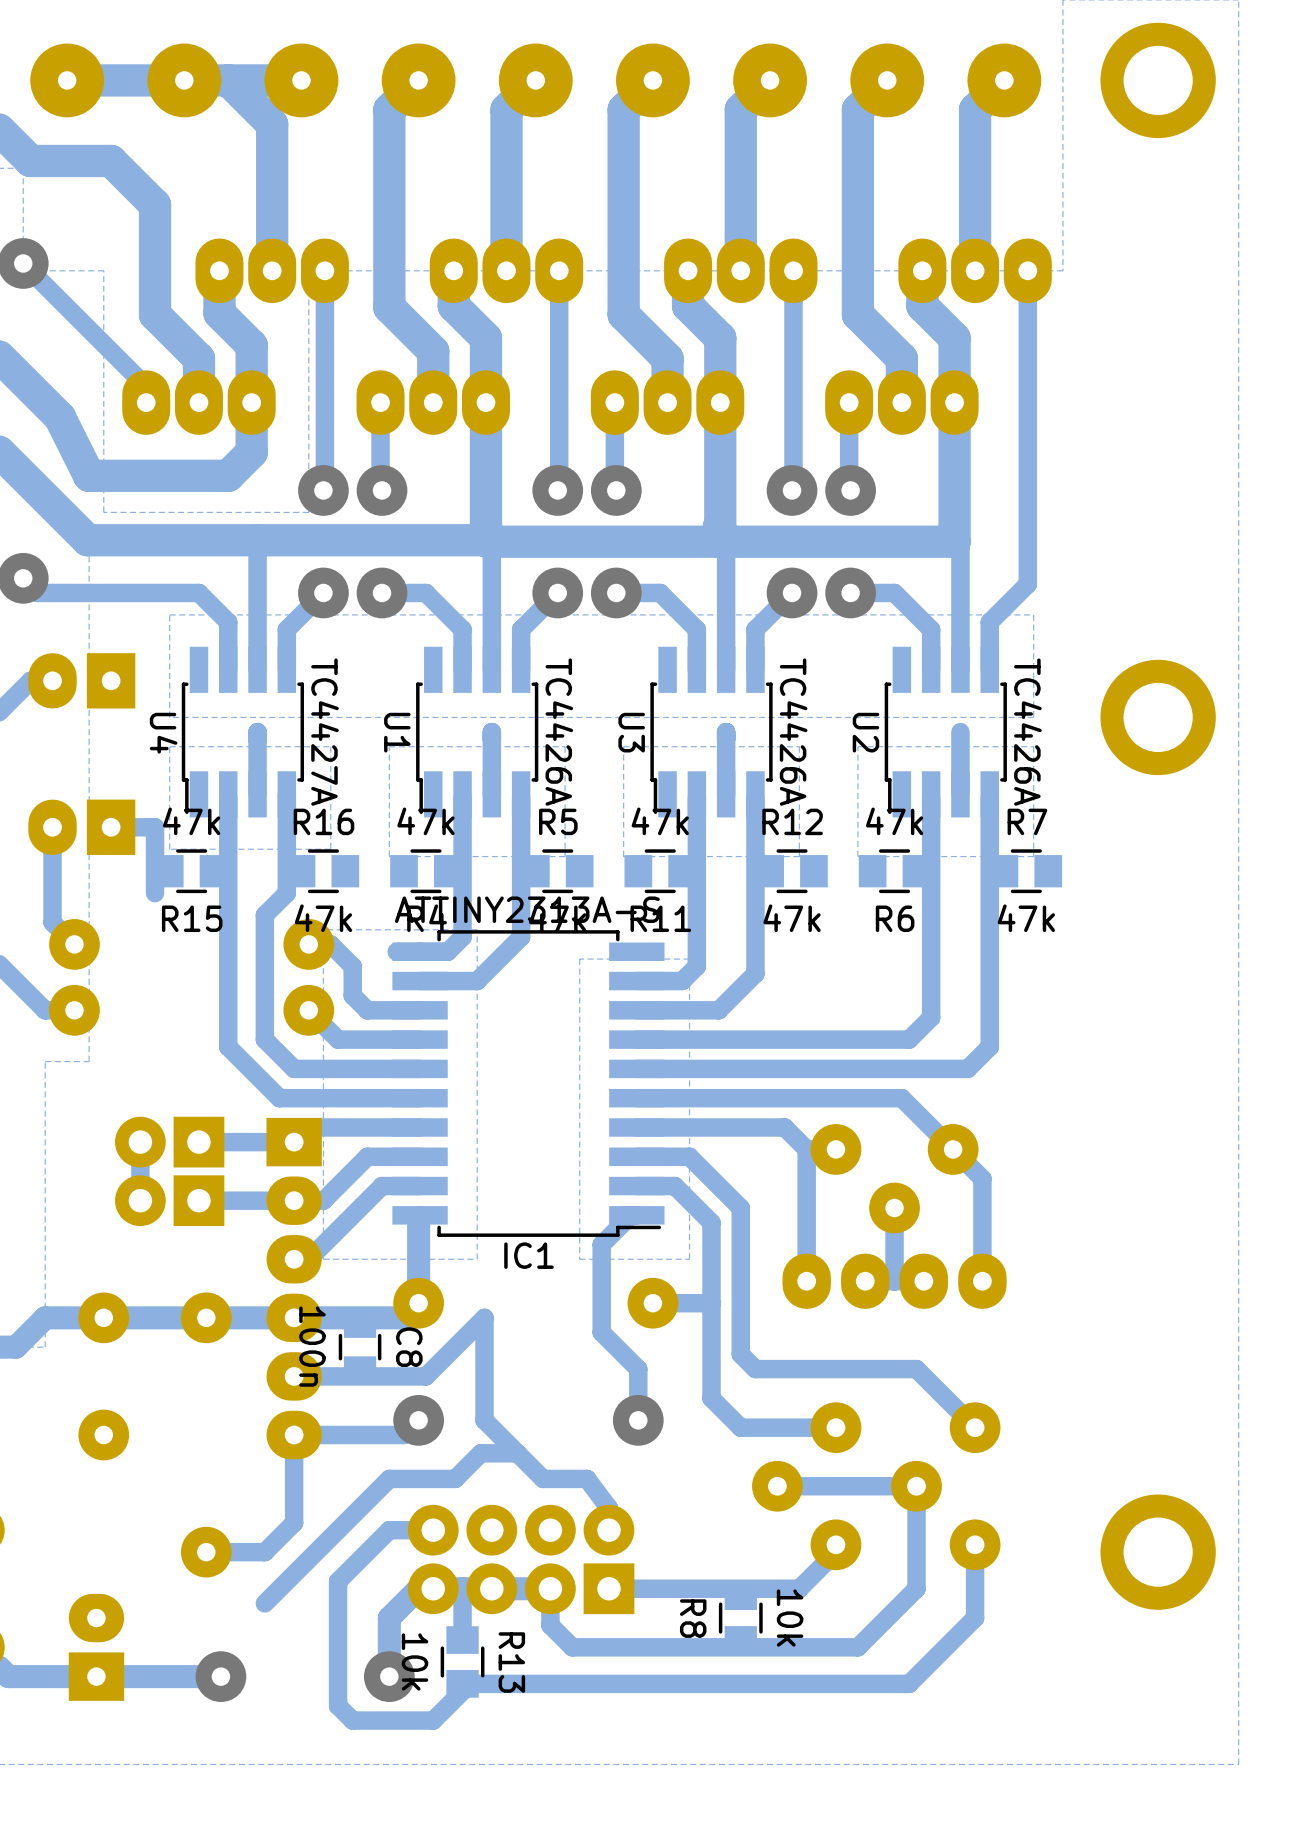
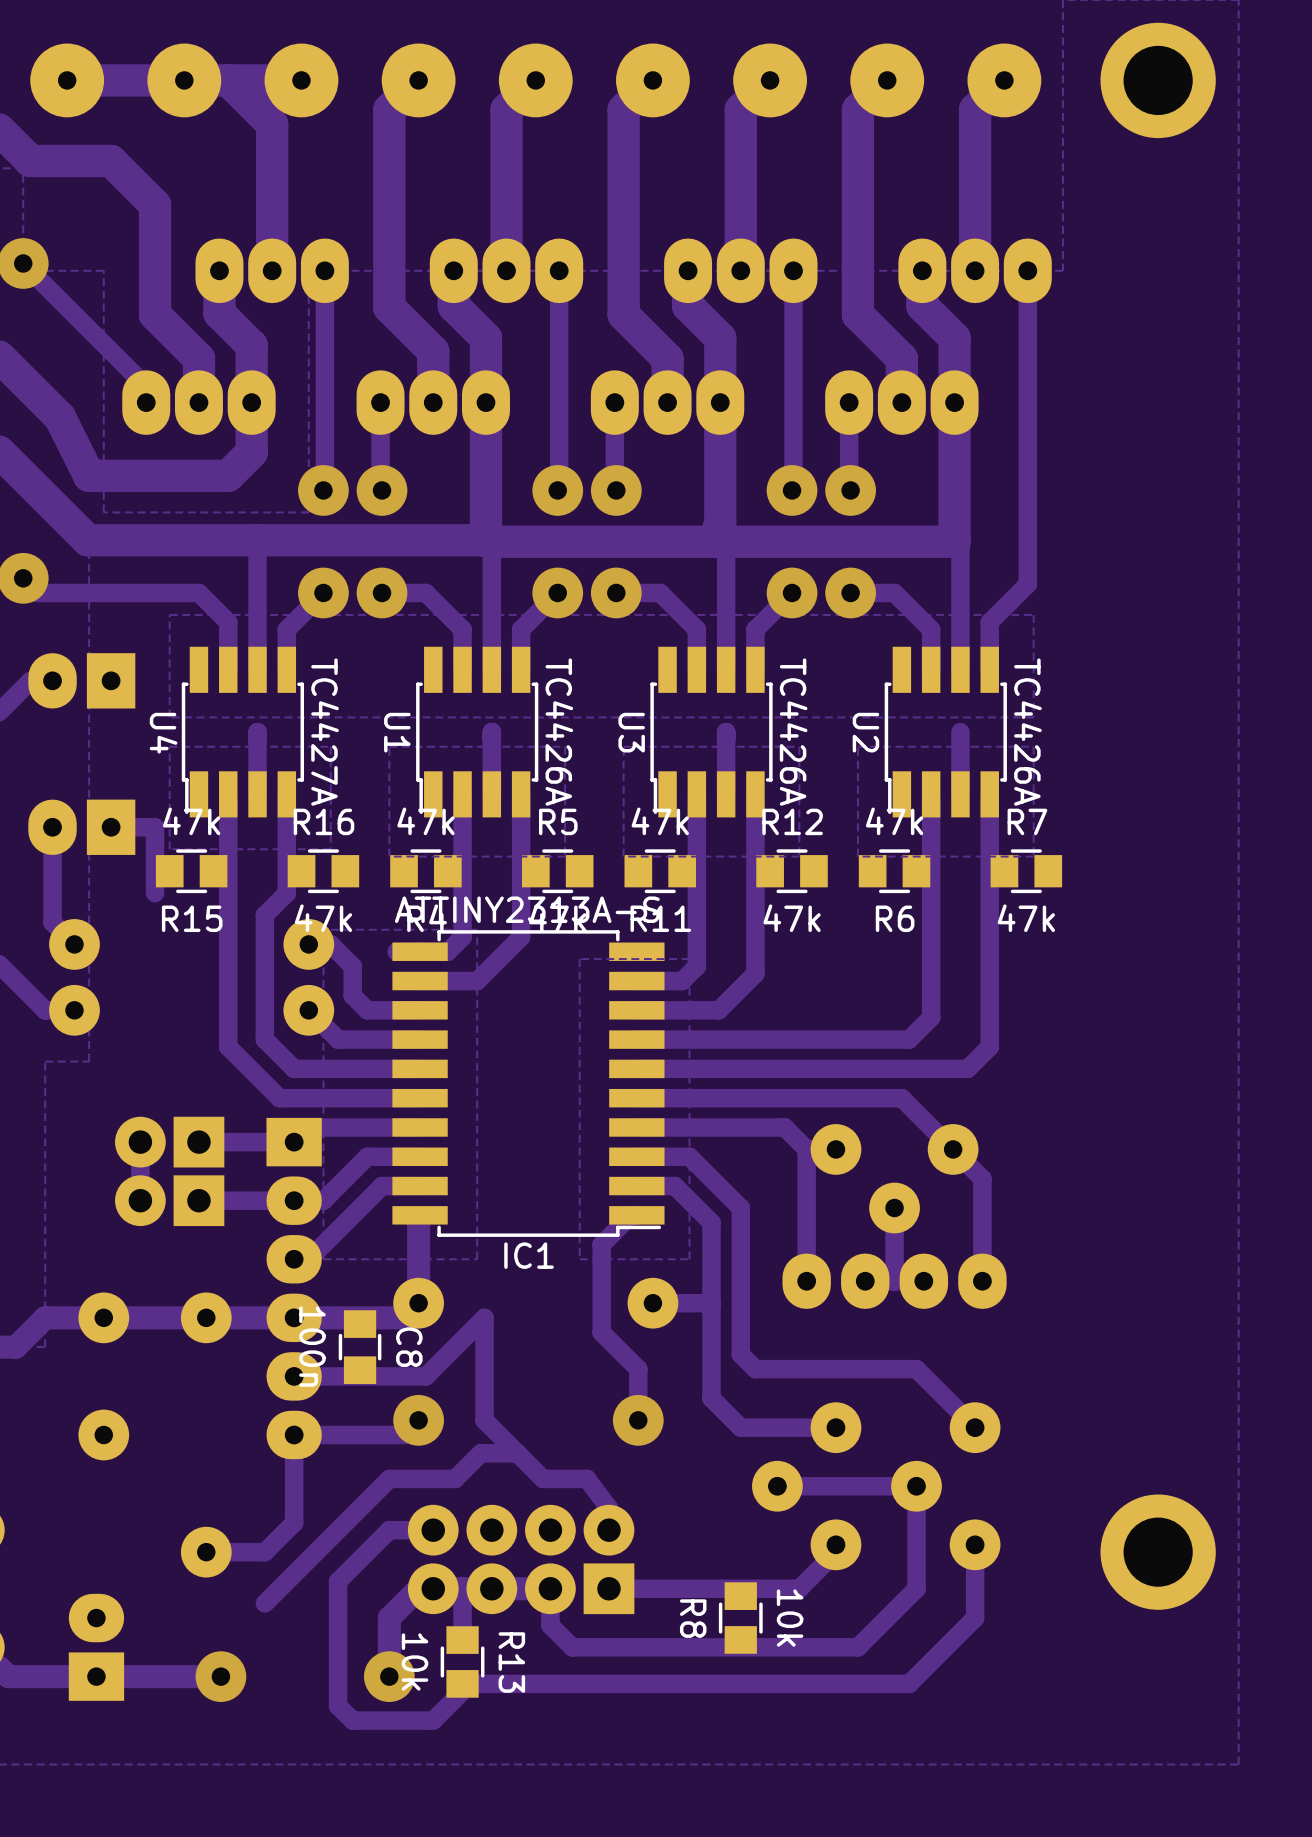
part: (1158, 717) -> none

